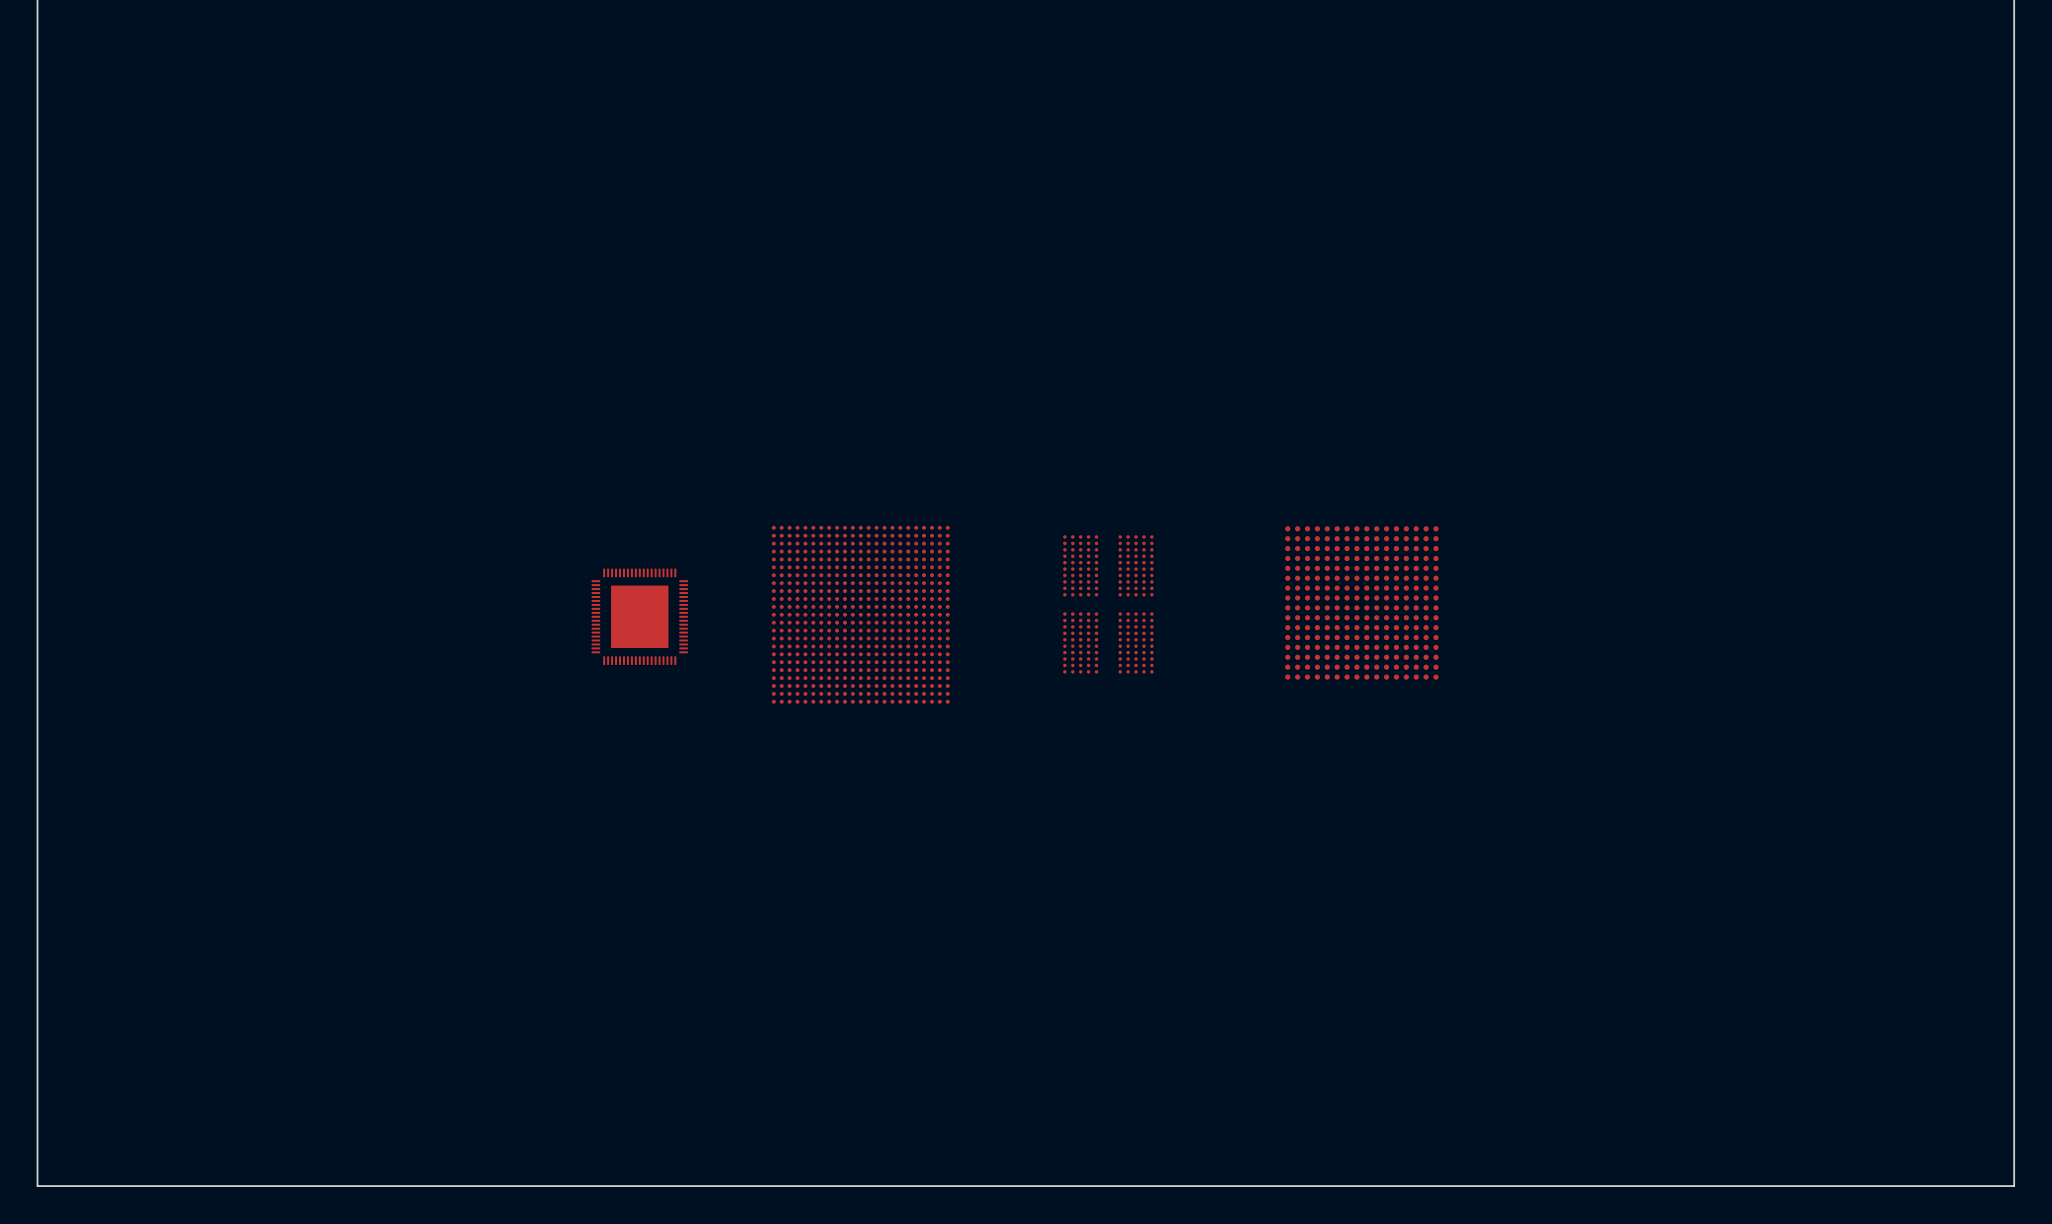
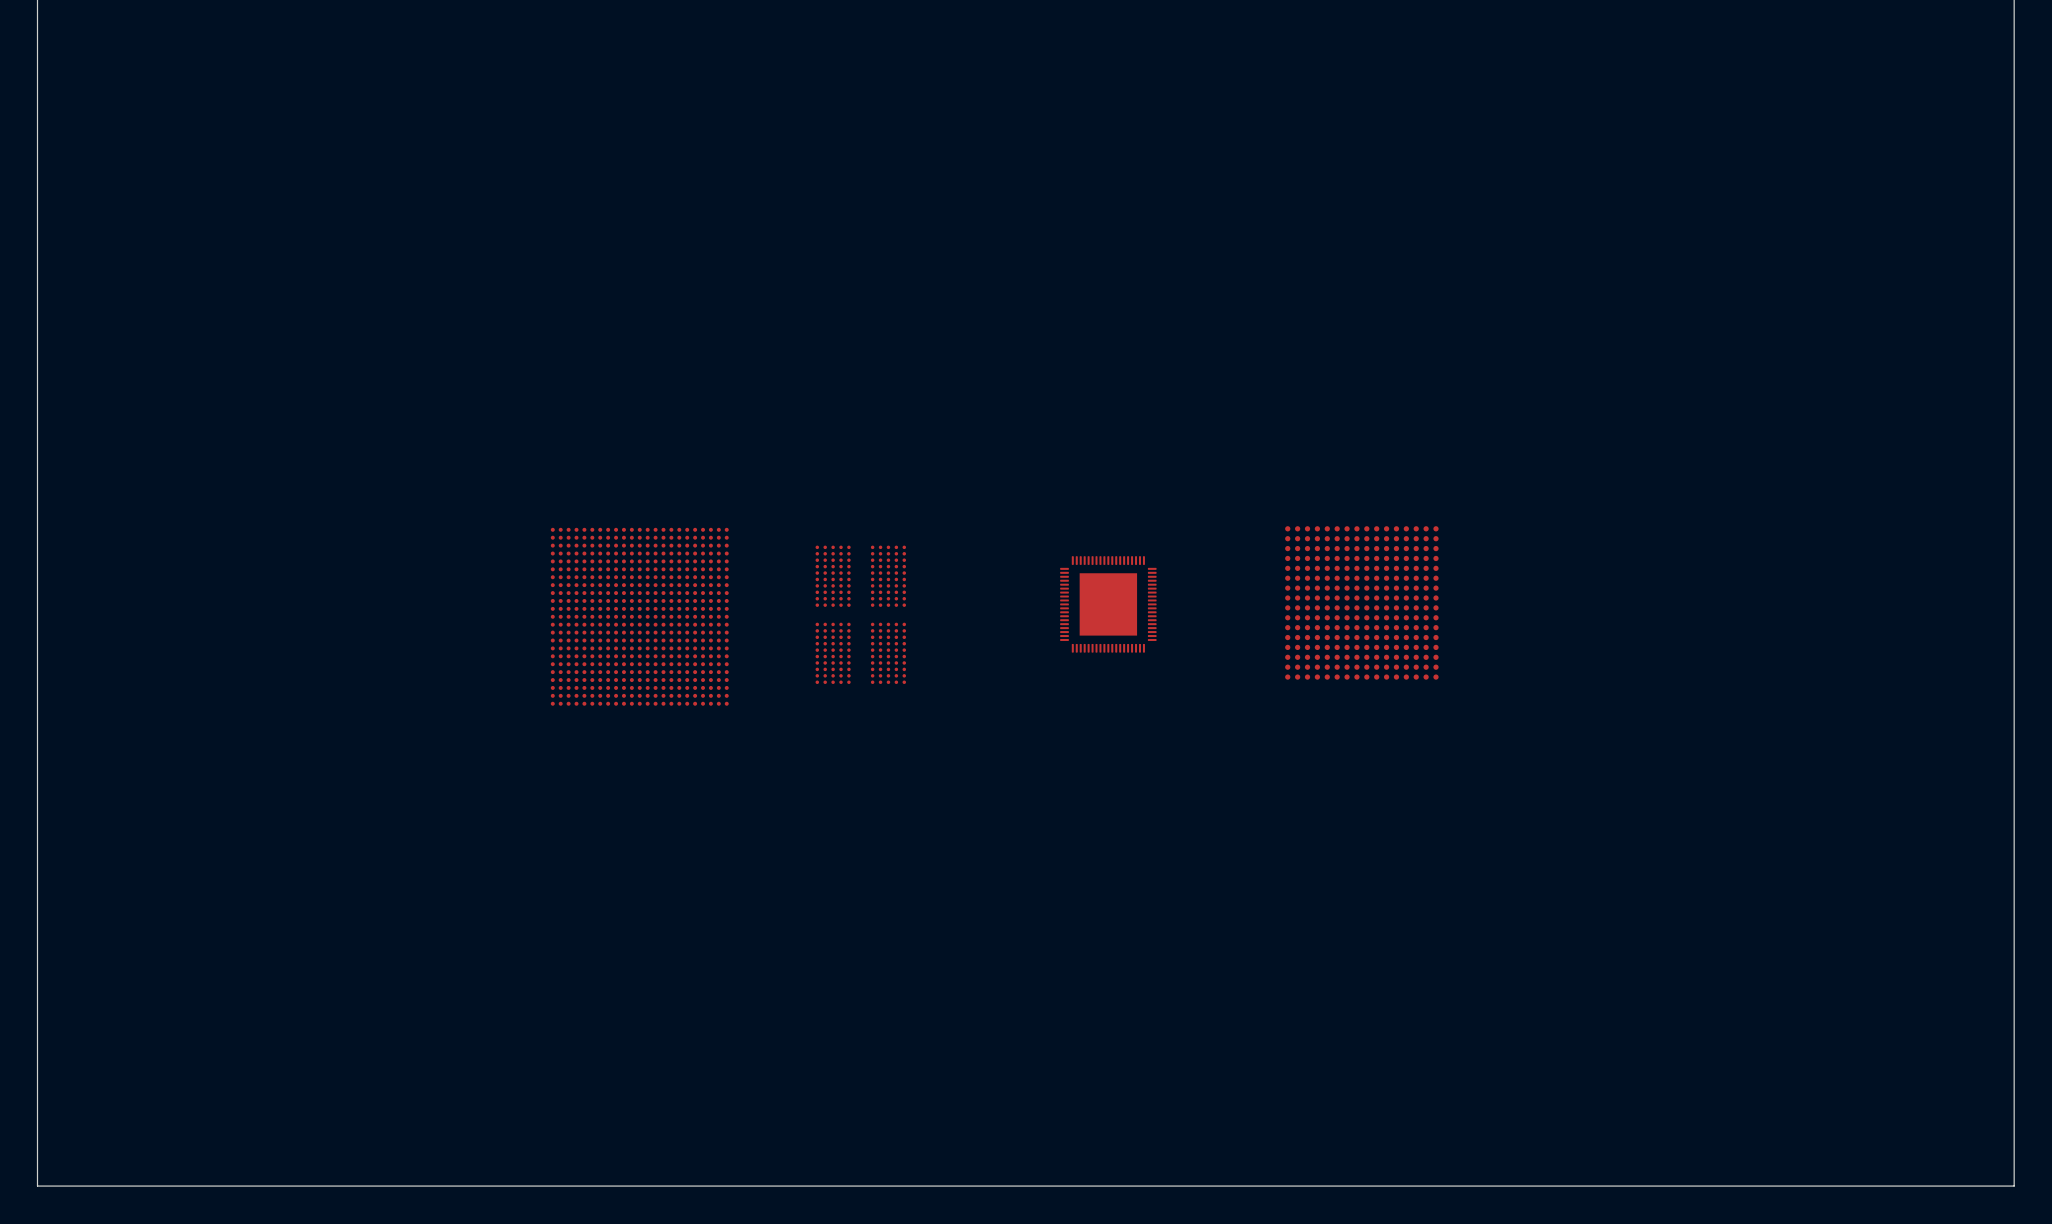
part footprint: [771, 525, 950, 704] -> [815, 545, 907, 684]
part footprint: [1063, 535, 1154, 674] -> [1060, 556, 1157, 653]
part footprint: [591, 568, 688, 665] -> [550, 527, 729, 706]

